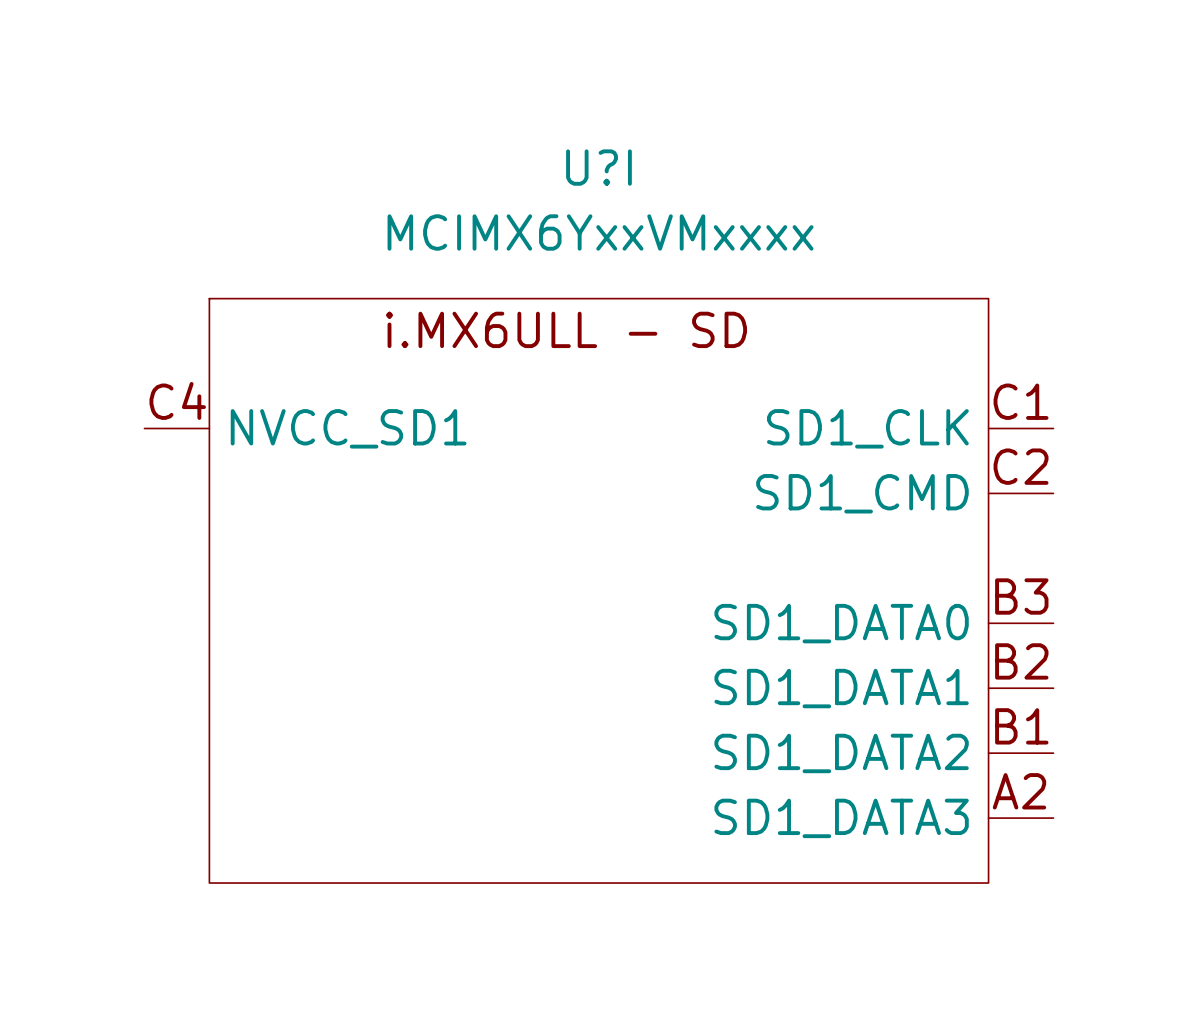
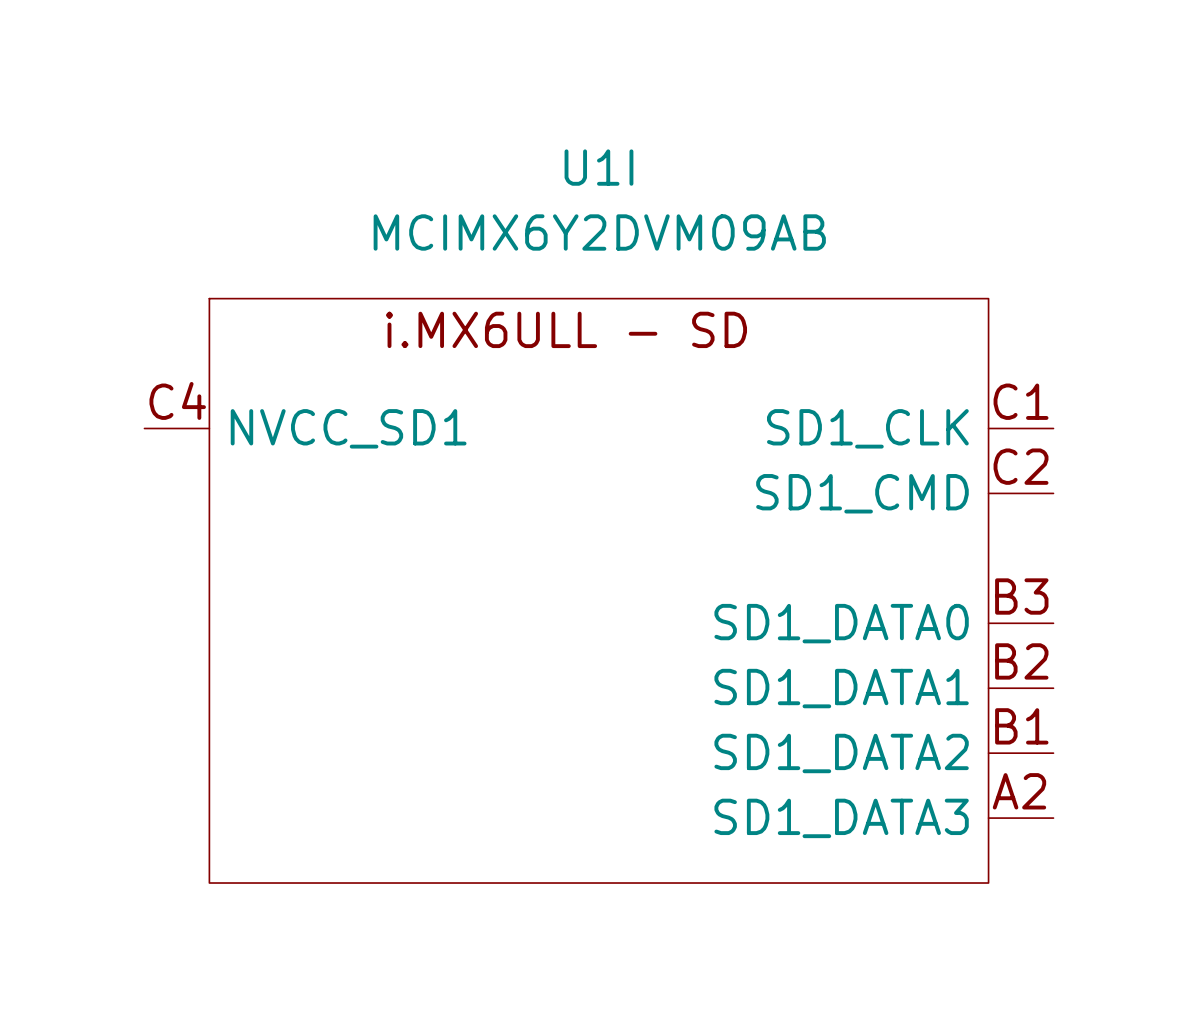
U?I name: U?I (598, 167) -> U1I (598, 167)
U?I value: MCIMX6YxxVMxxxx (600, 232) -> MCIMX6Y2DVM09AB (599, 232)

